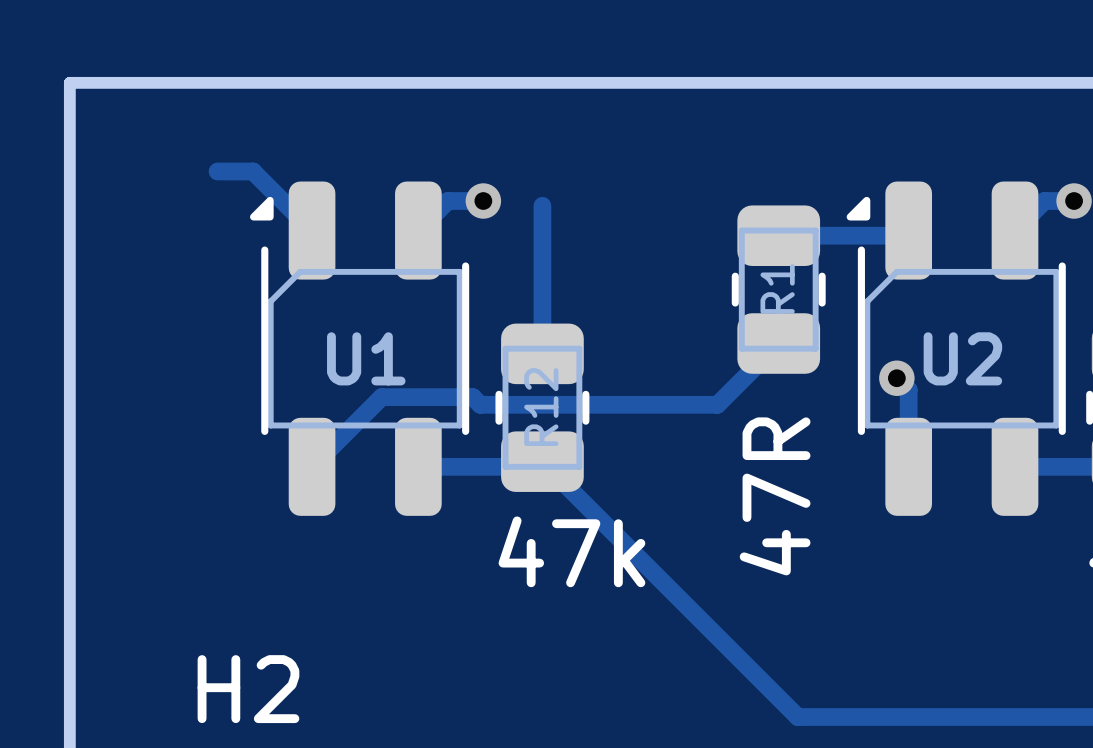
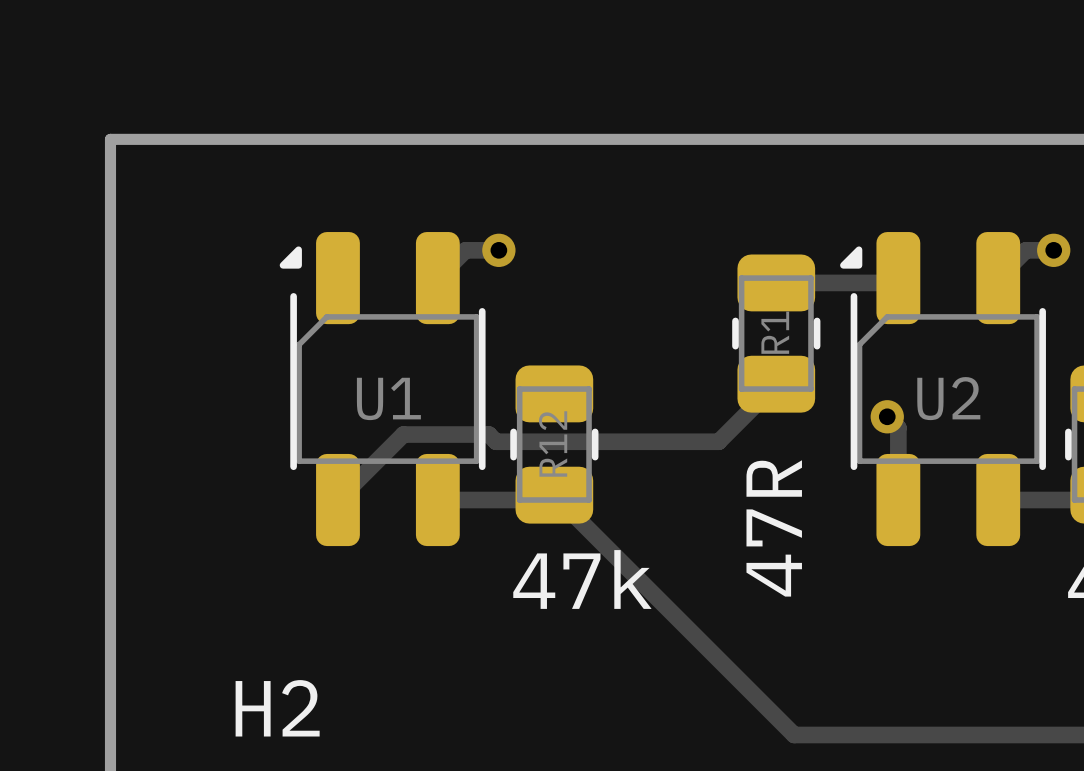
track: (217, 171) (252, 171) (312, 230) -> none
track: (542, 205) (542, 353) -> none

